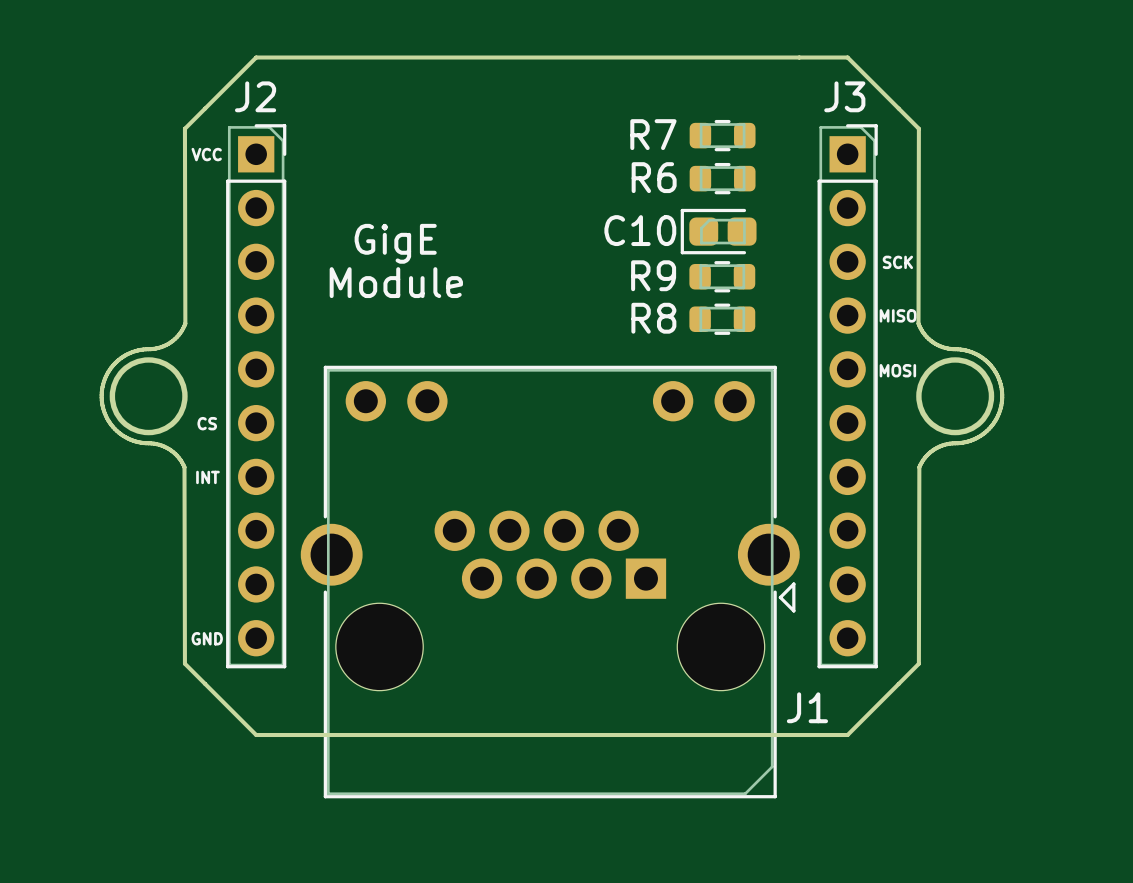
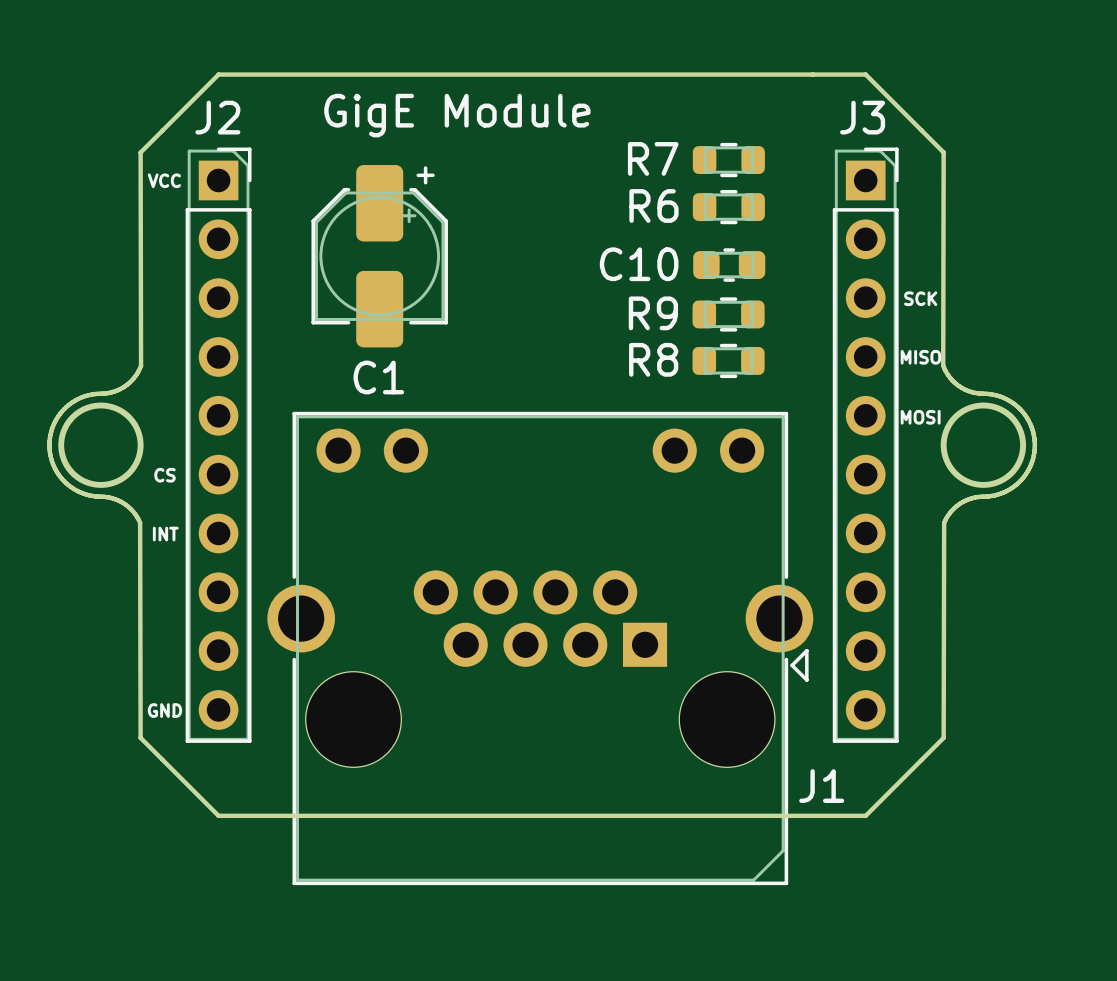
text: none -> GigE Module (457, 115)
C10 footprint: [680, 208, 757, 255] -> [693, 248, 766, 282]
C1: none -> (379, 256)
text: GigE (395, 243) -> none
text: Module (396, 282) -> none

